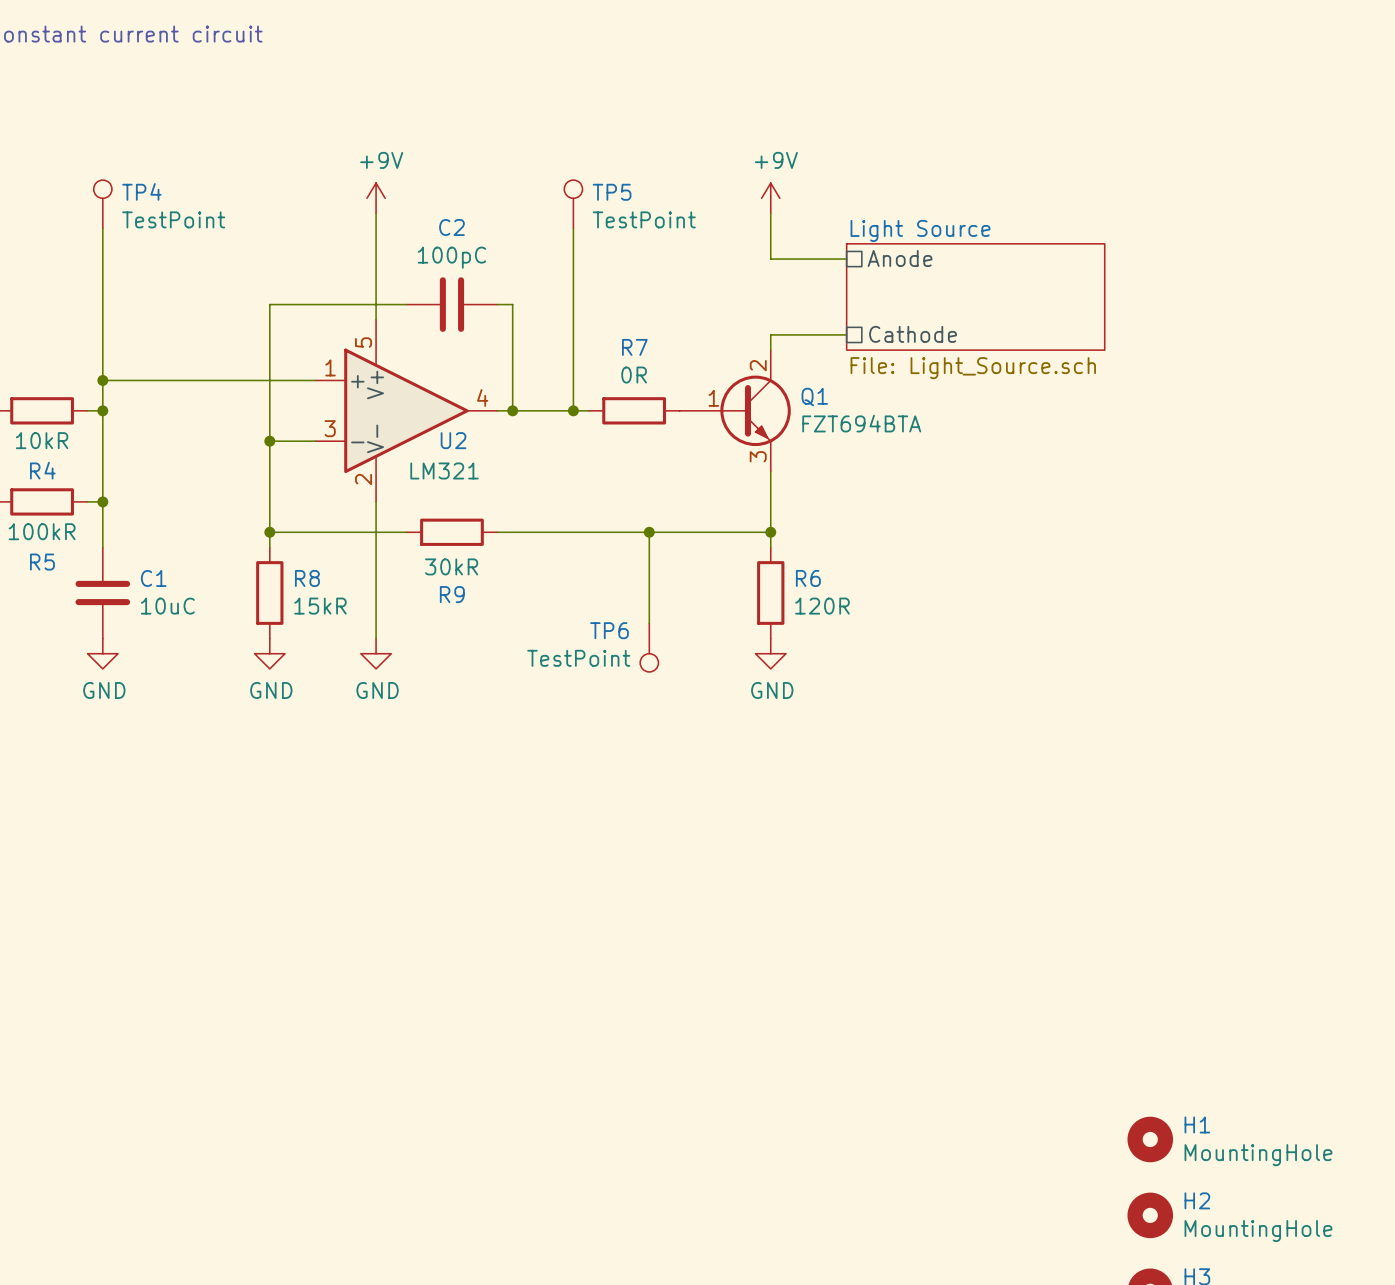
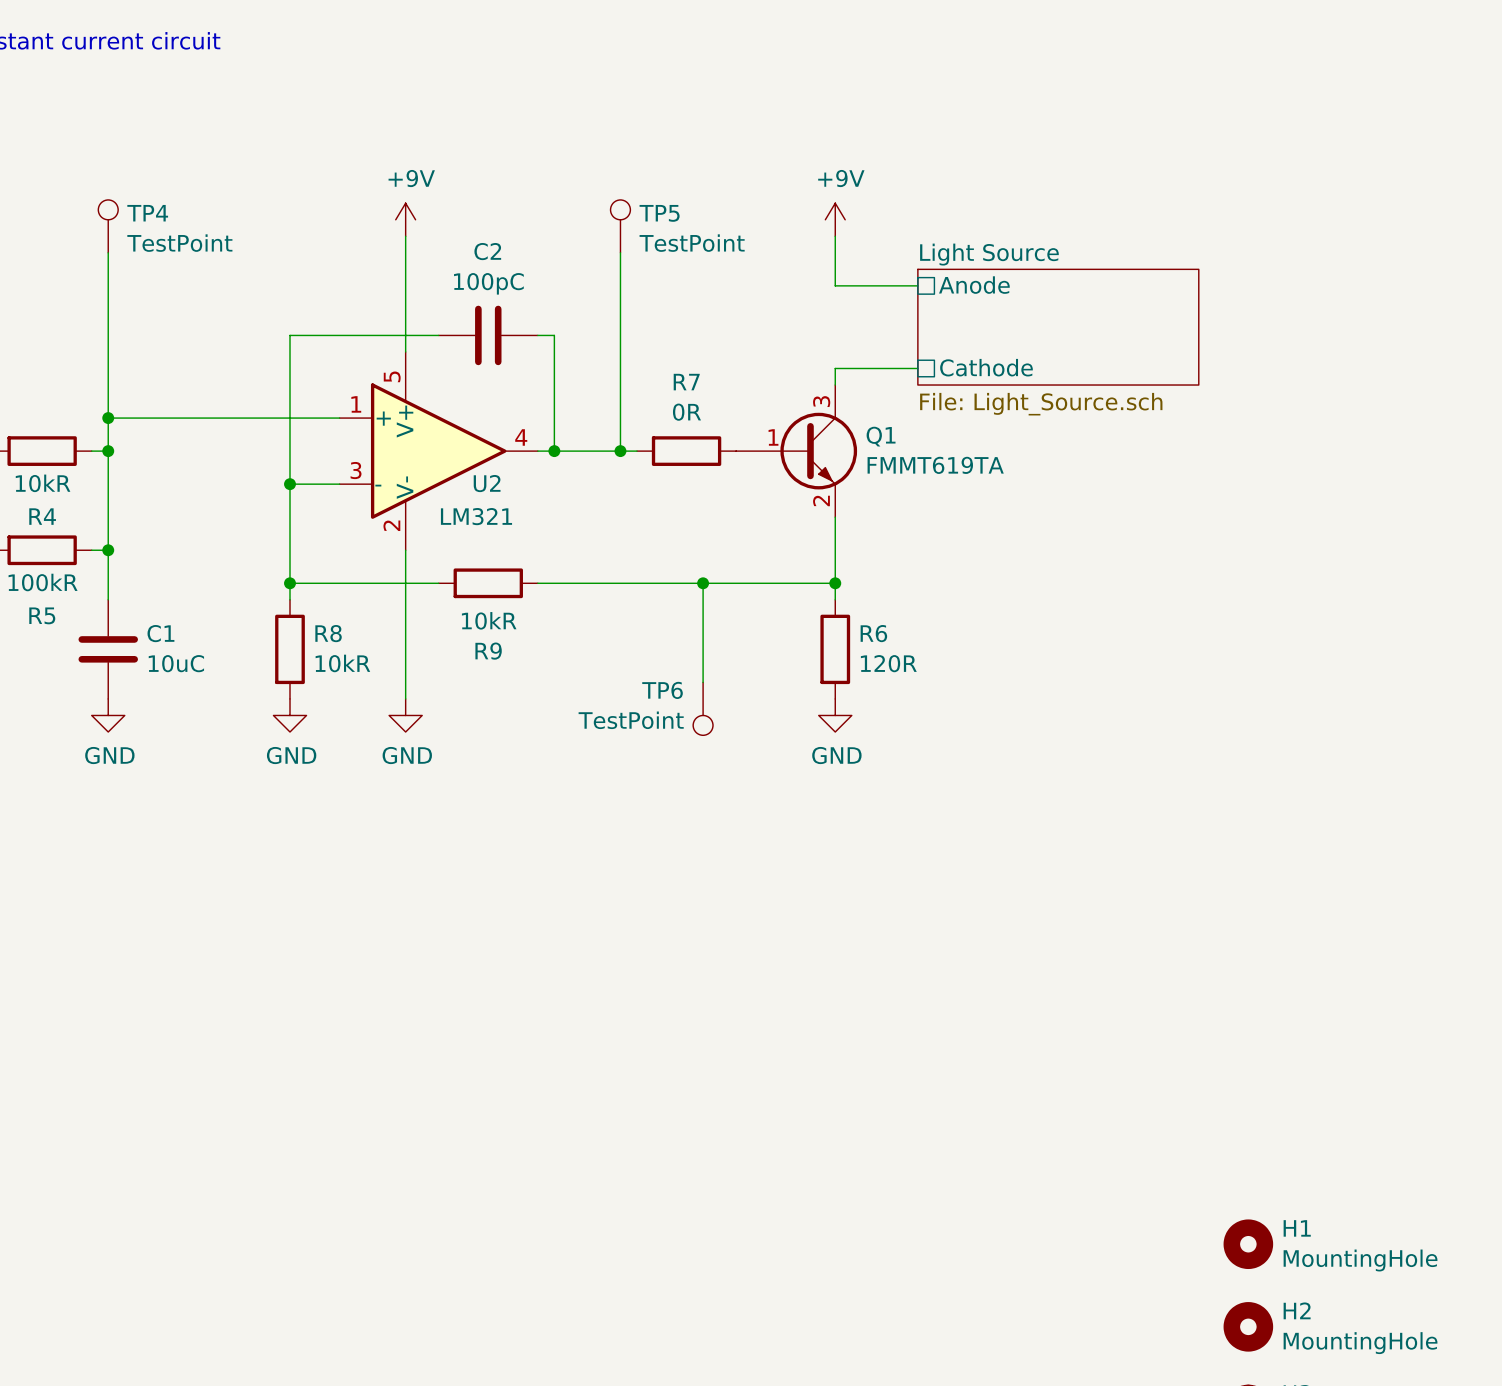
Q1 pin number: 2 (758, 365) -> 3 (821, 401)
Q1 value: FZT694BTA (861, 423) -> FMMT619TA (935, 465)
Q1 pin number: 3 (758, 456) -> 2 (821, 500)
R9 value: 30kR (451, 566) -> 10kR (489, 620)
R8 value: 15kR (320, 606) -> 10kR (342, 663)

